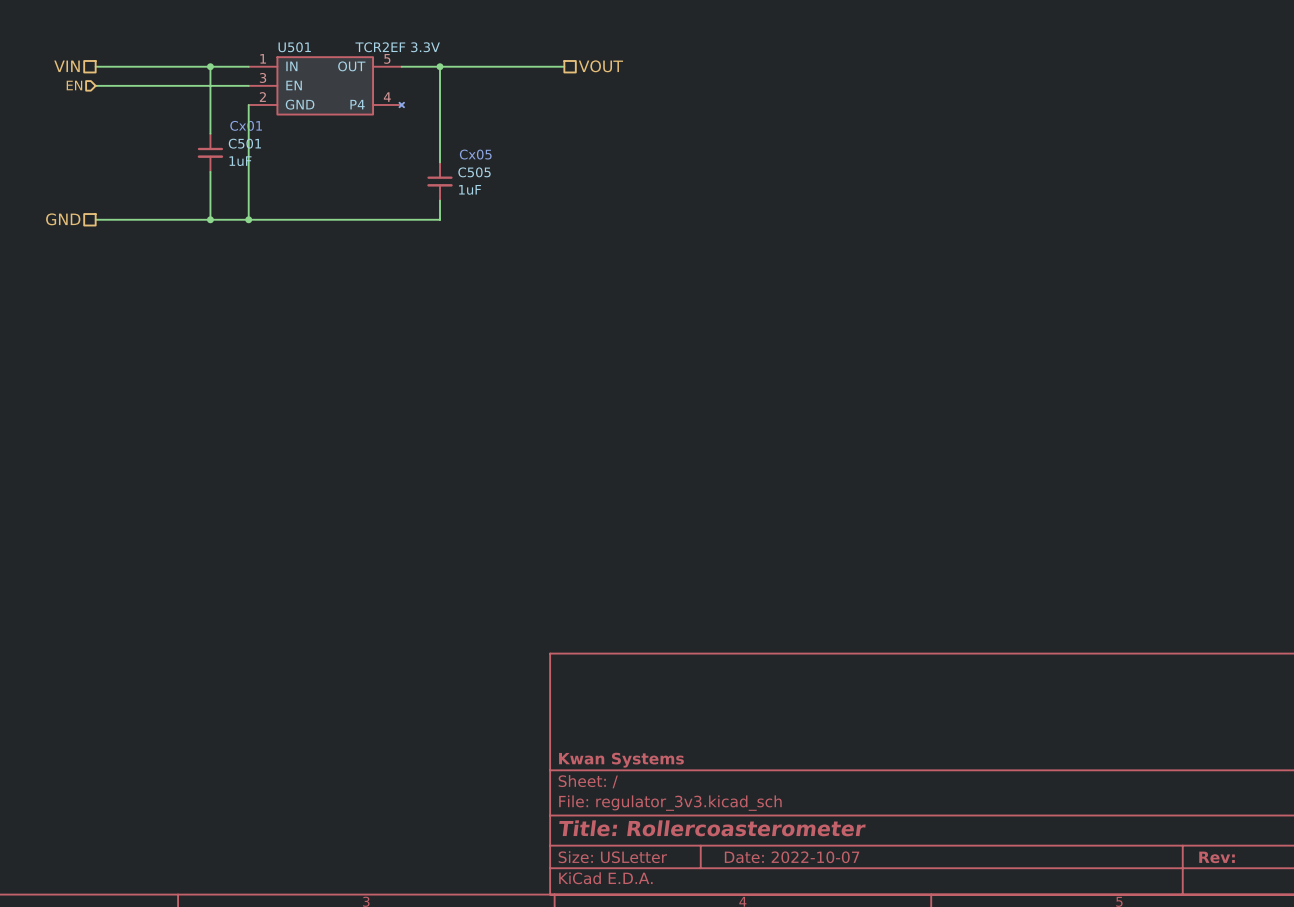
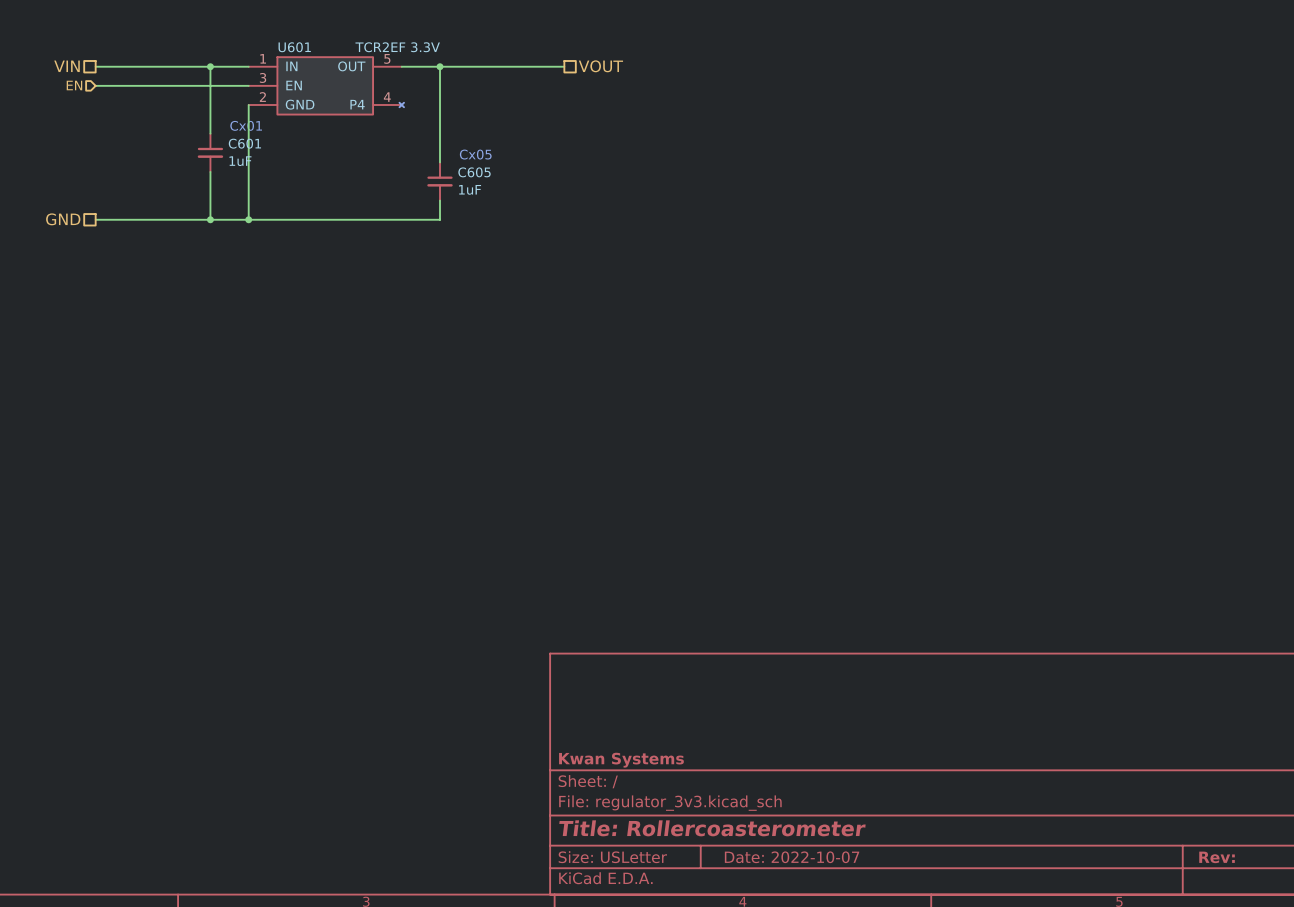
U501 name: U501 (294, 47) -> U601 (294, 47)
C501 name: C501 (244, 143) -> C601 (244, 143)
C505 name: C505 (474, 172) -> C605 (474, 172)

